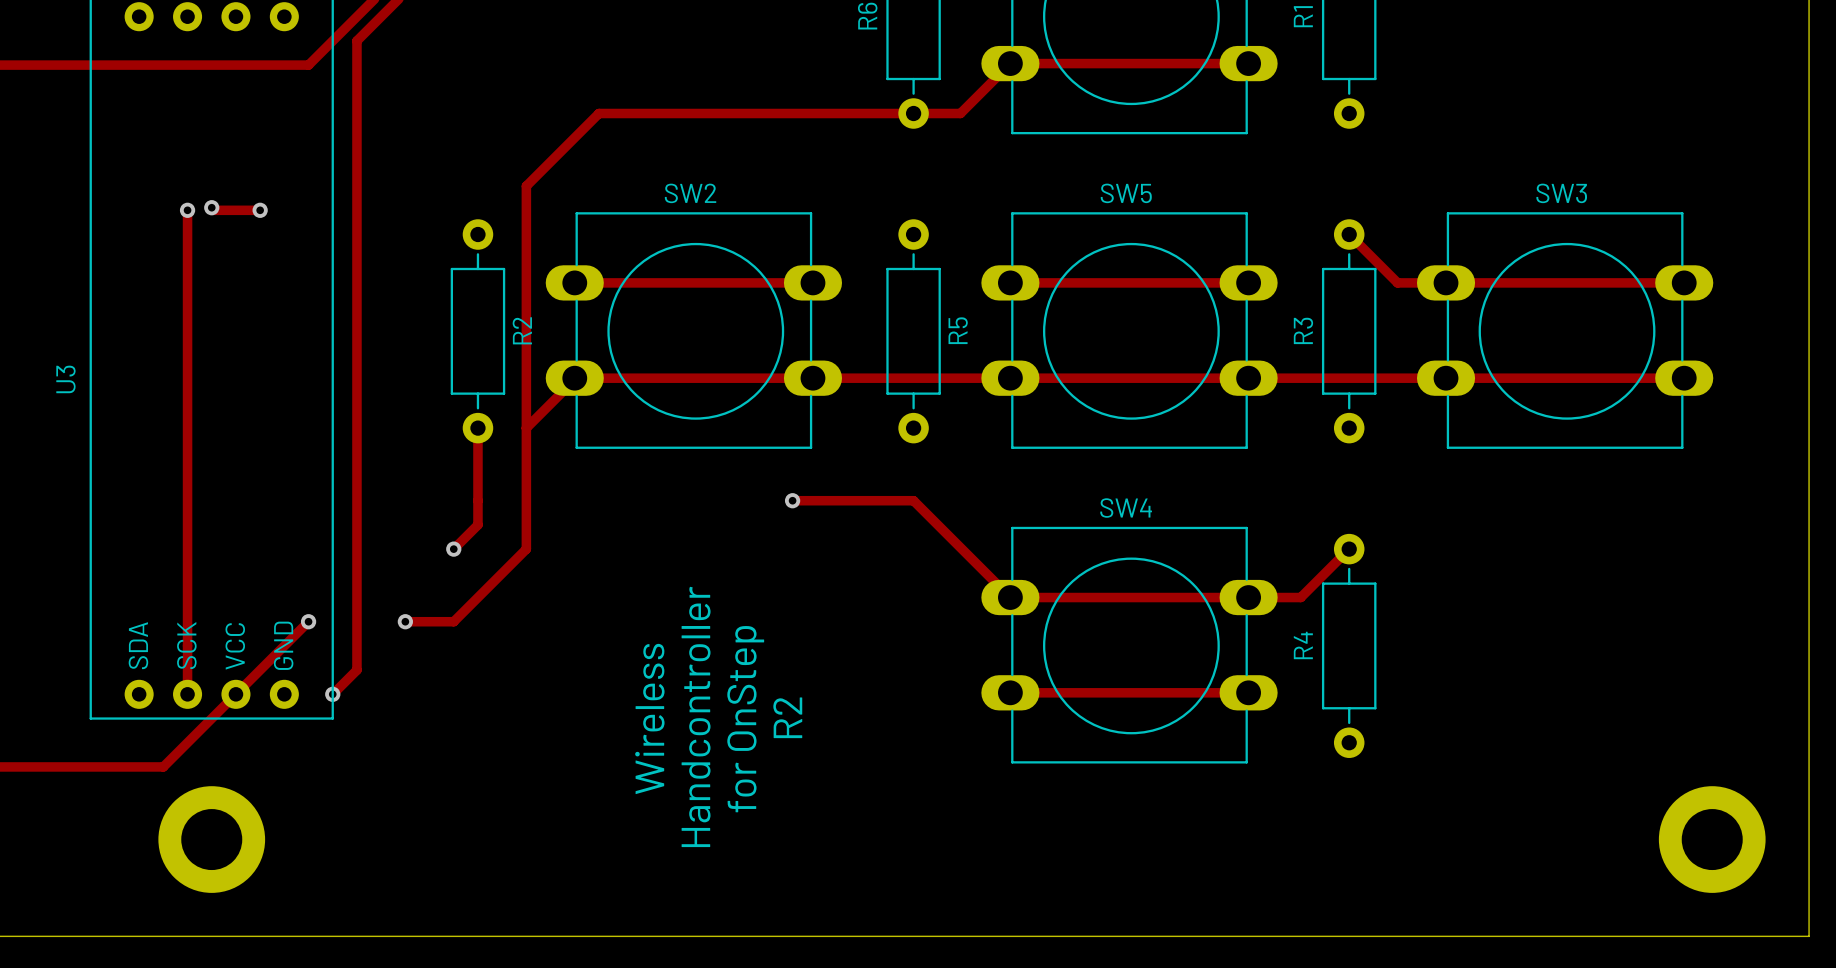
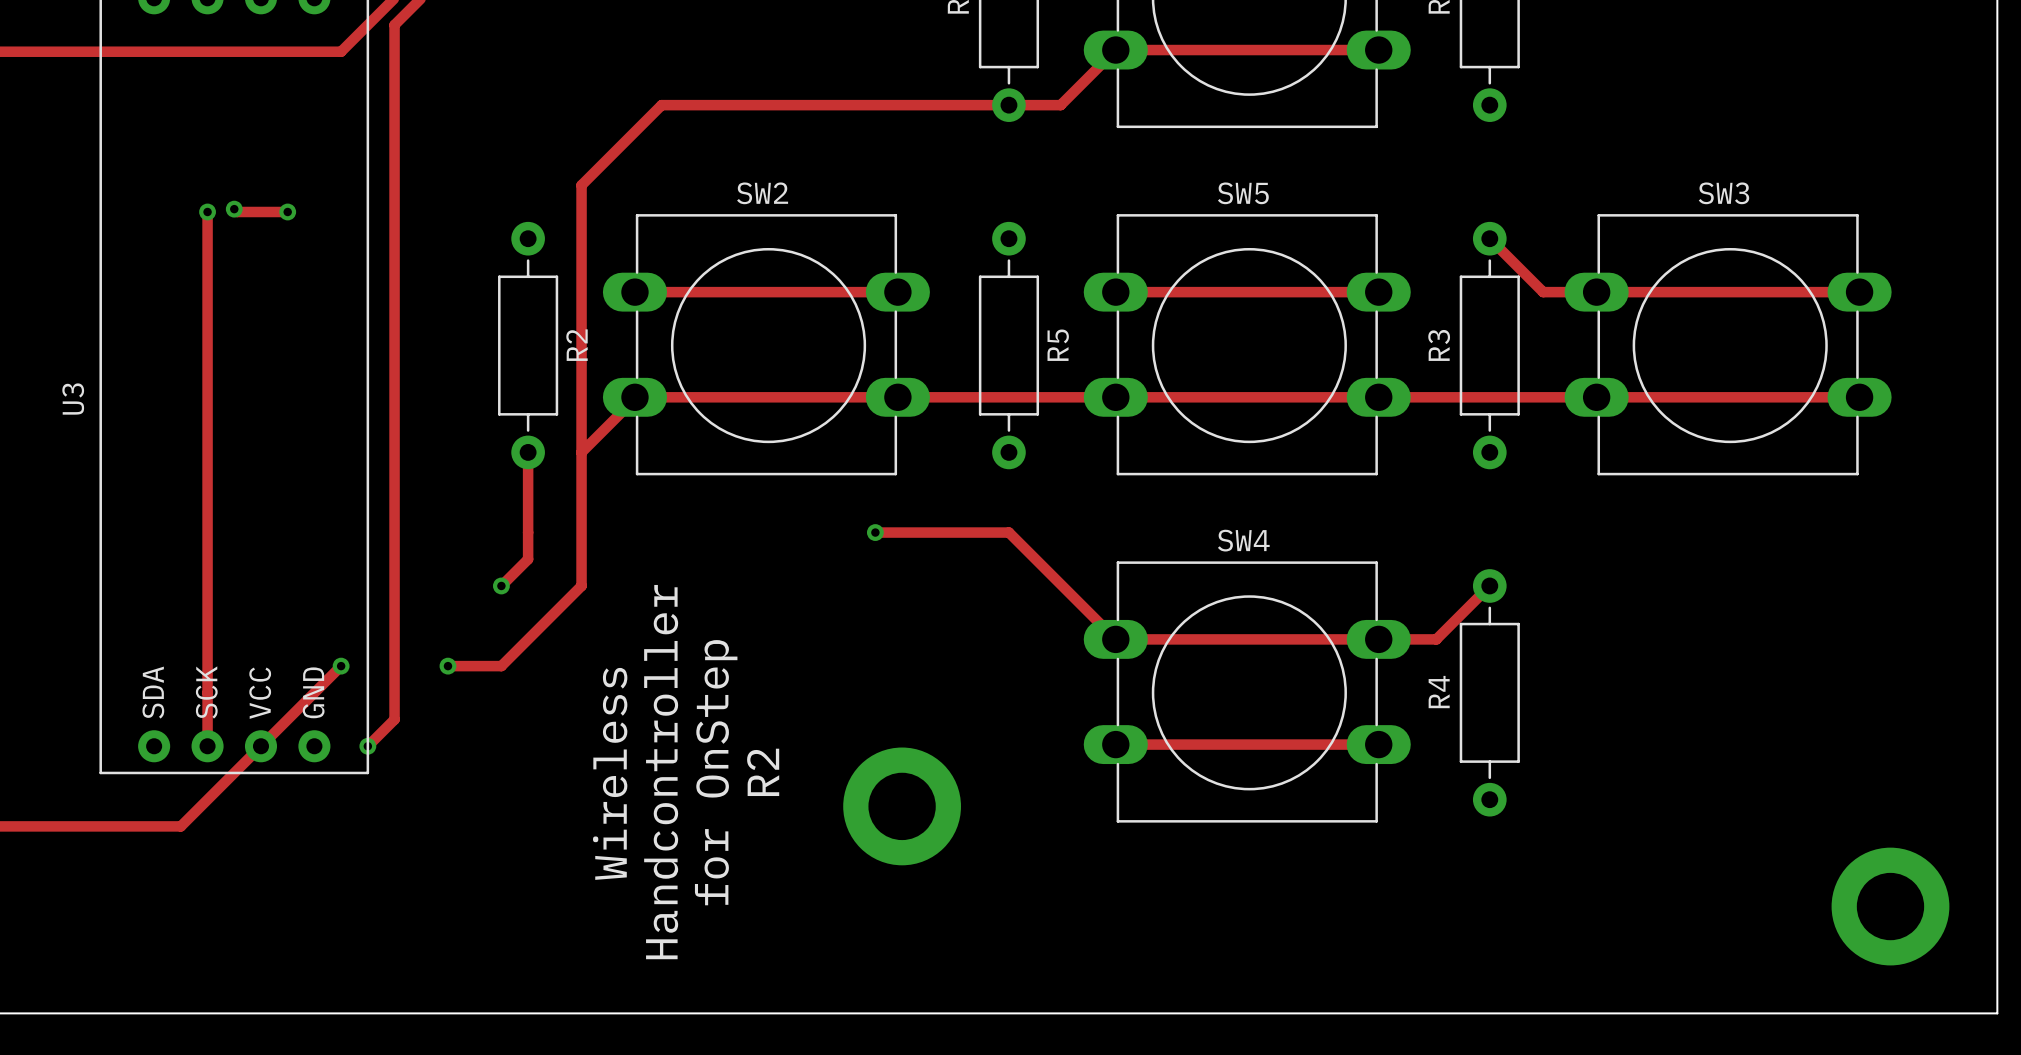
text: none -> Handcontroller (661, 772)
text: Handcontroller (696, 716) -> R2 (763, 772)
text: R2 (787, 717) -> none
text: none -> Wireless (610, 773)
text: Wireless (649, 718) -> for OnStep (716, 772)
text: for OnStep (745, 719) -> none
part: none -> (902, 806)
part: (211, 839) -> none

